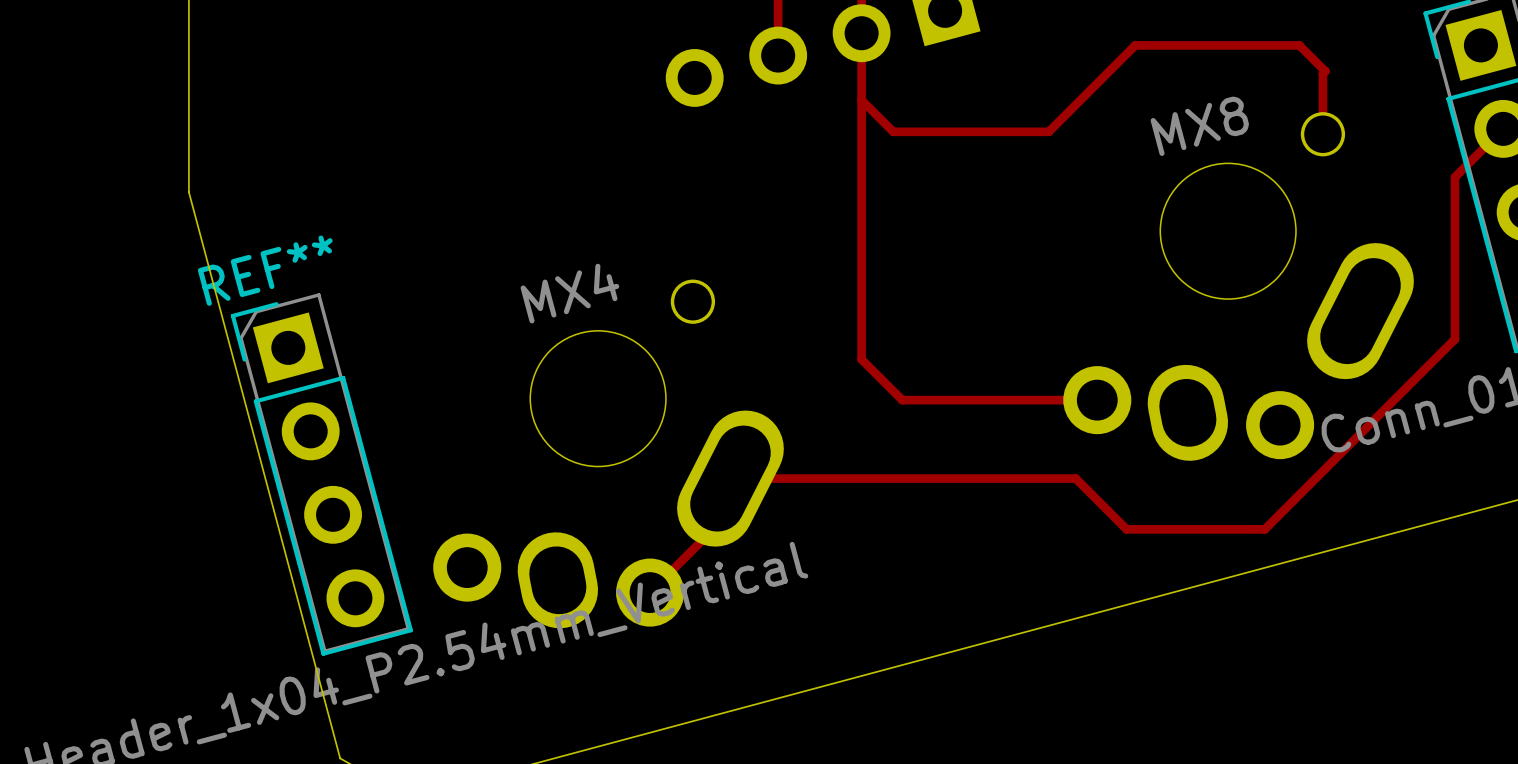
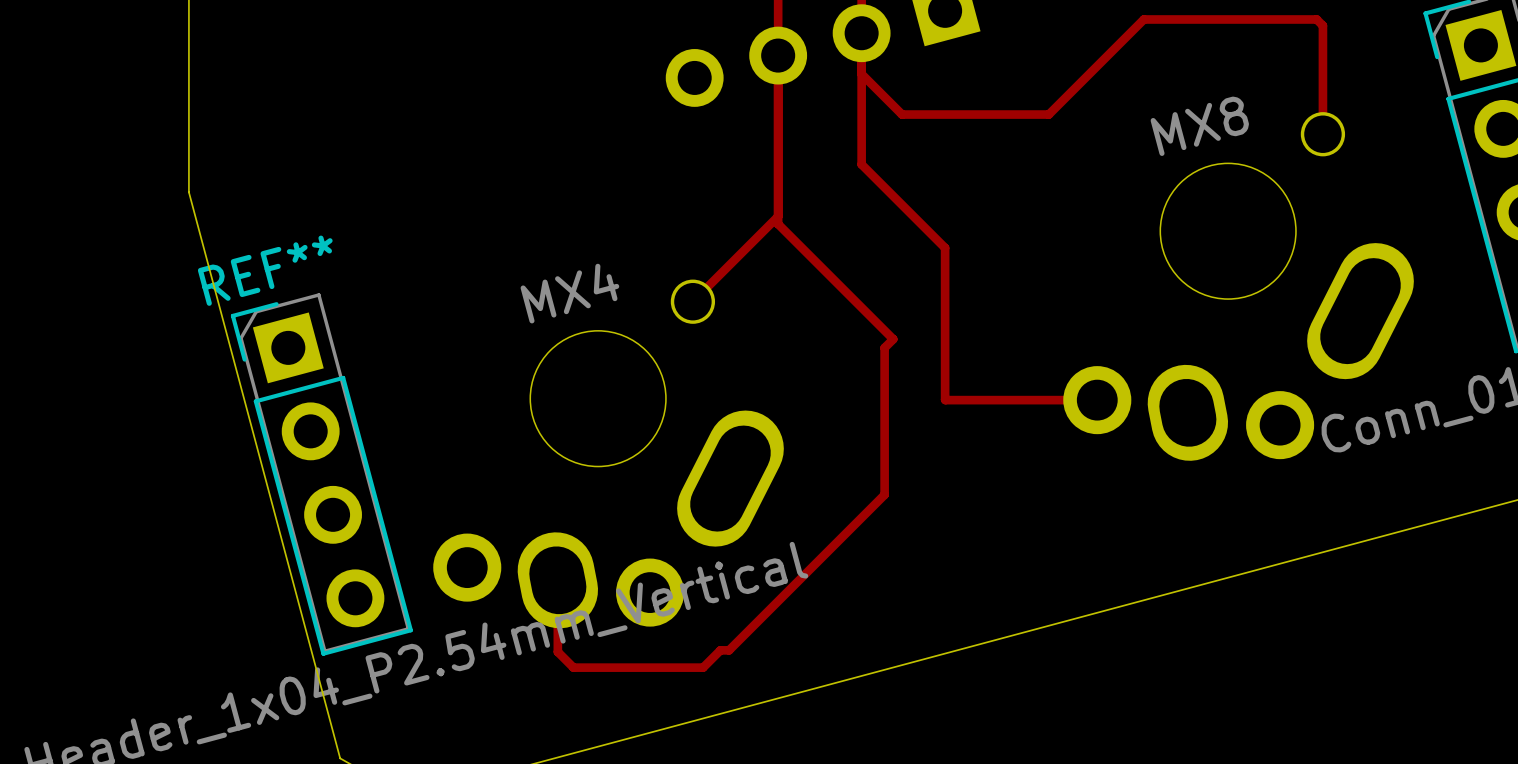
track: none -> (778, 55) (778, 224) (893, 339) (884, 347) (884, 494) (729, 650) (720, 650) (703, 667) (573, 667) (557, 651) (557, 580)
track: (1322, 73) (1325, 71) (1299, 45) (1135, 45) (1048, 131) (893, 131) (861, 100) -> (1322, 73) (1322, 25) (1316, 19) (1143, 19) (1048, 114) (902, 114) (861, 74)
track: (1503, 128) (1454, 177) (1454, 339) (1264, 529) (1126, 529) (1075, 478) (730, 478) (730, 512) (650, 592) -> none
track: (861, 164) (861, 359) (902, 400) (945, 400) -> (861, 164) (945, 247) (945, 399)
track: none -> (778, 216) (692, 301)

